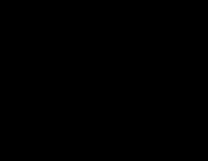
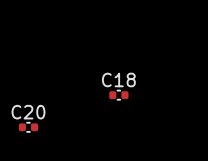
C18: none -> (118, 95)
C20: none -> (28, 127)

